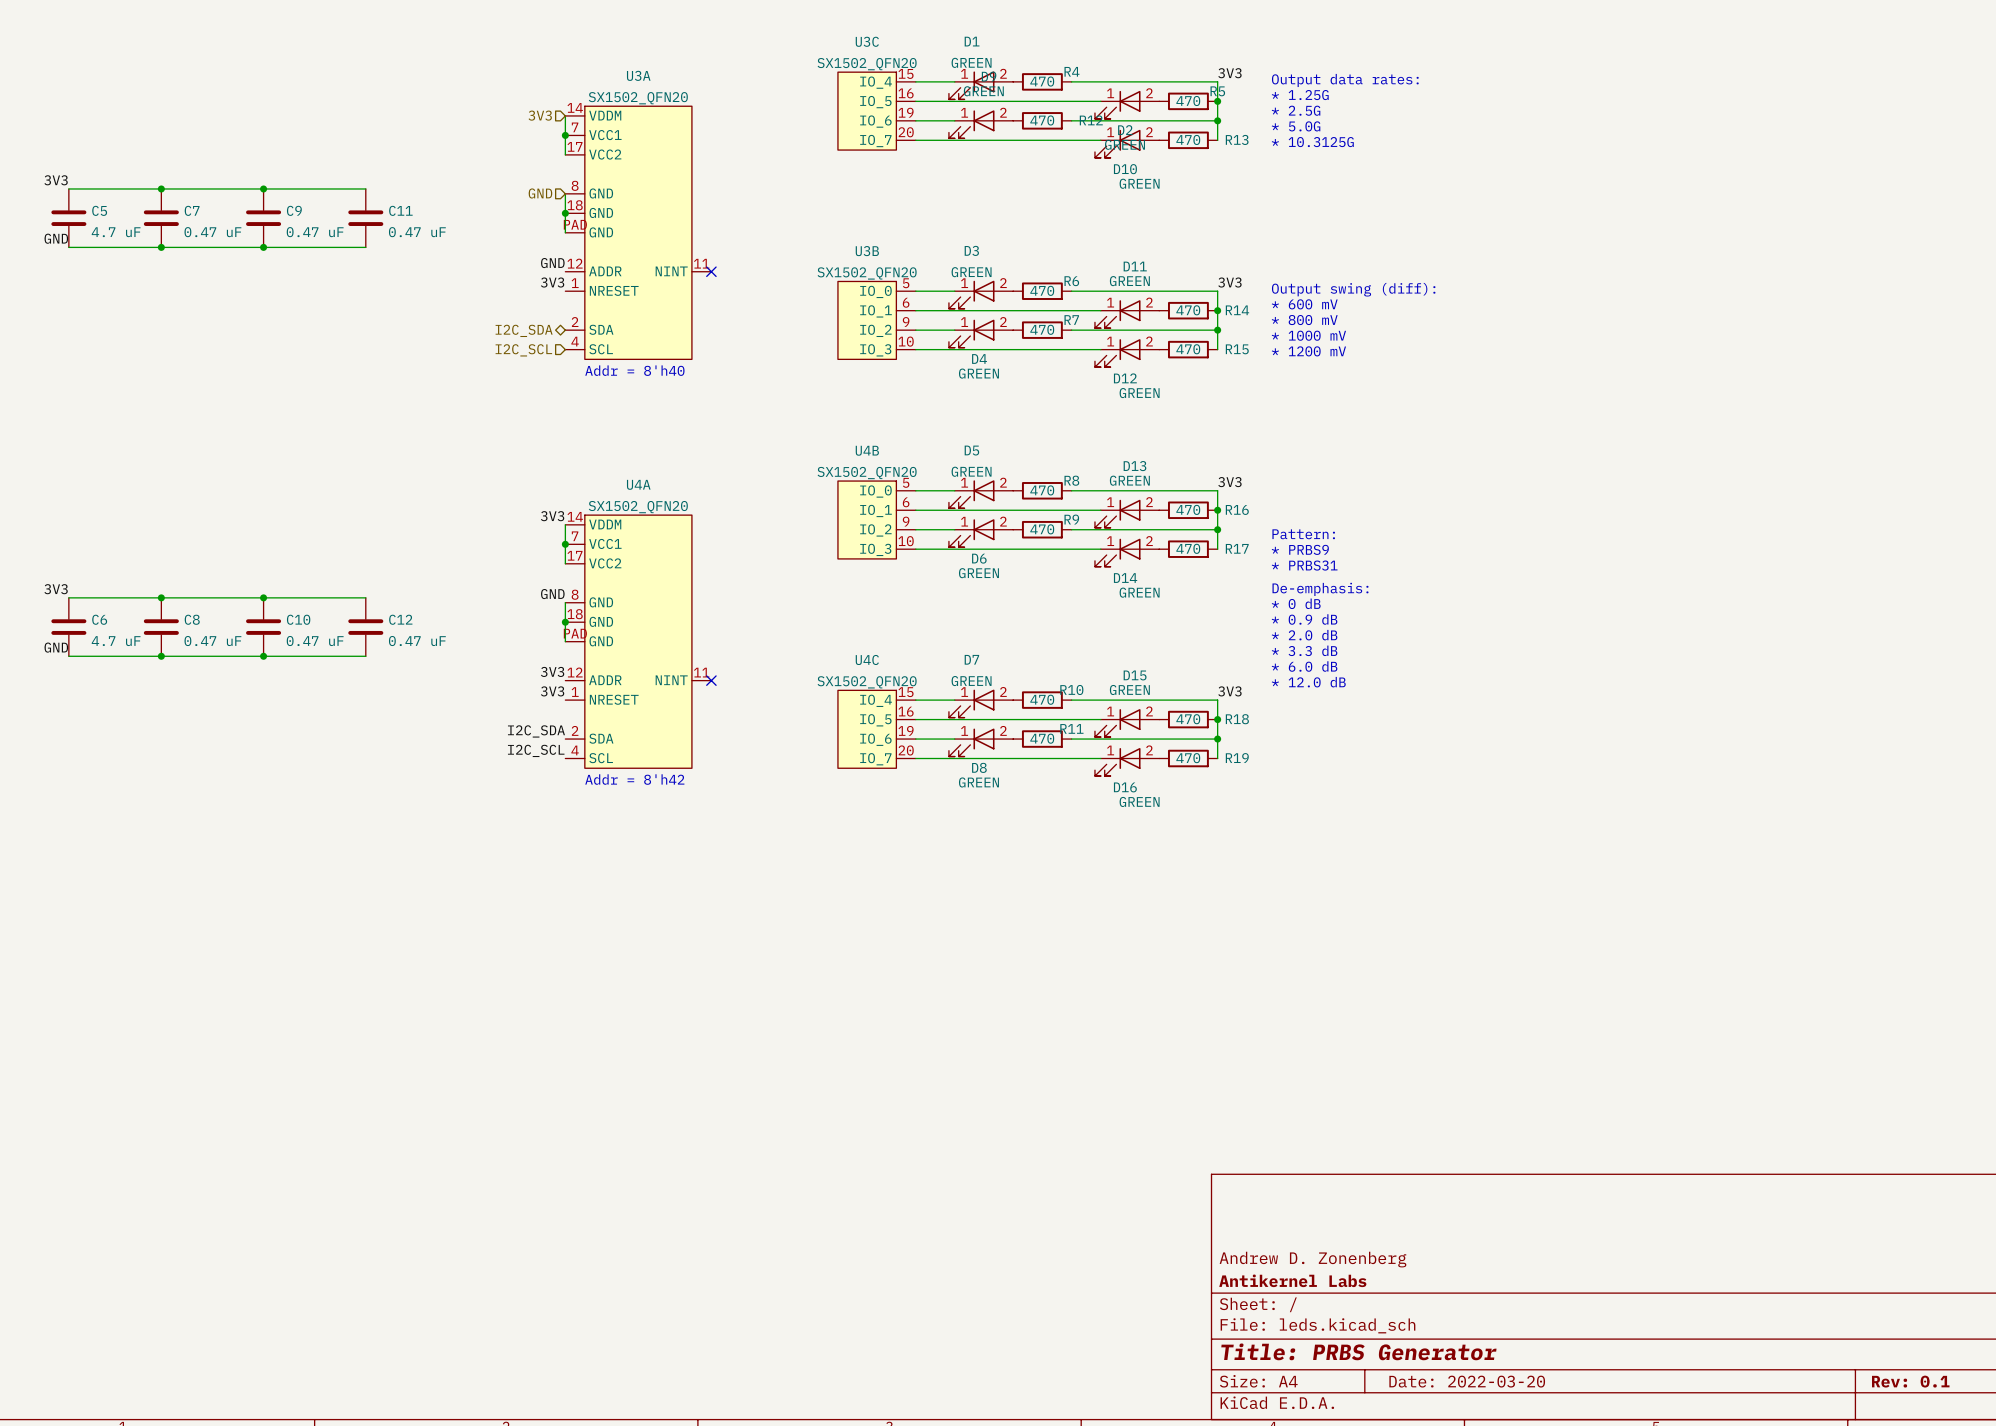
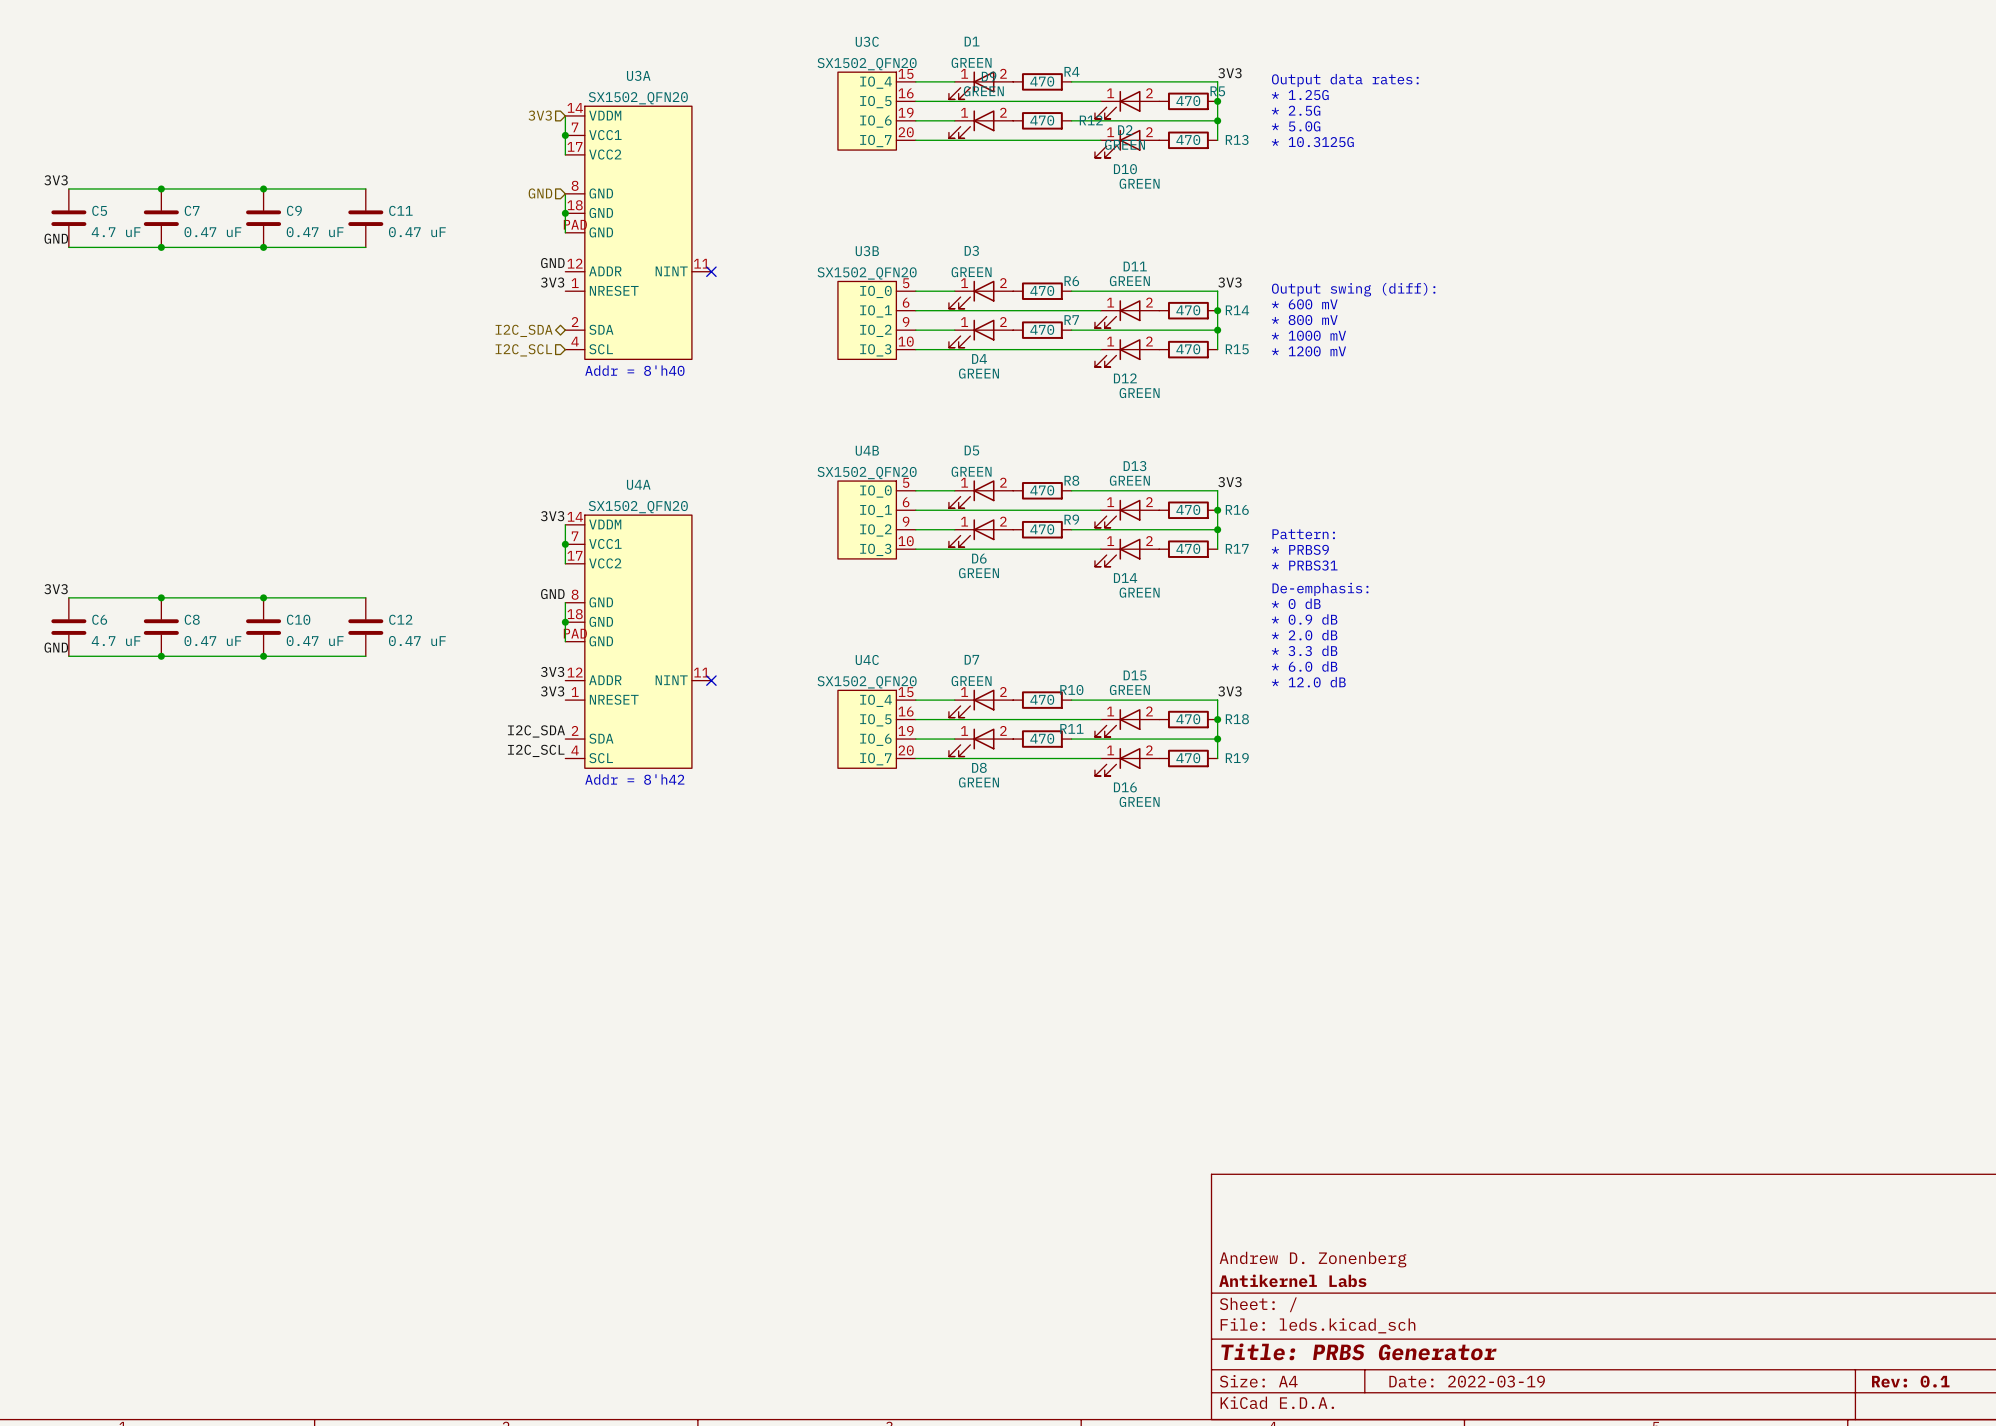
title block: Date: 2022-03-20 (1467, 1381) -> Date: 2022-03-19 (1467, 1381)

